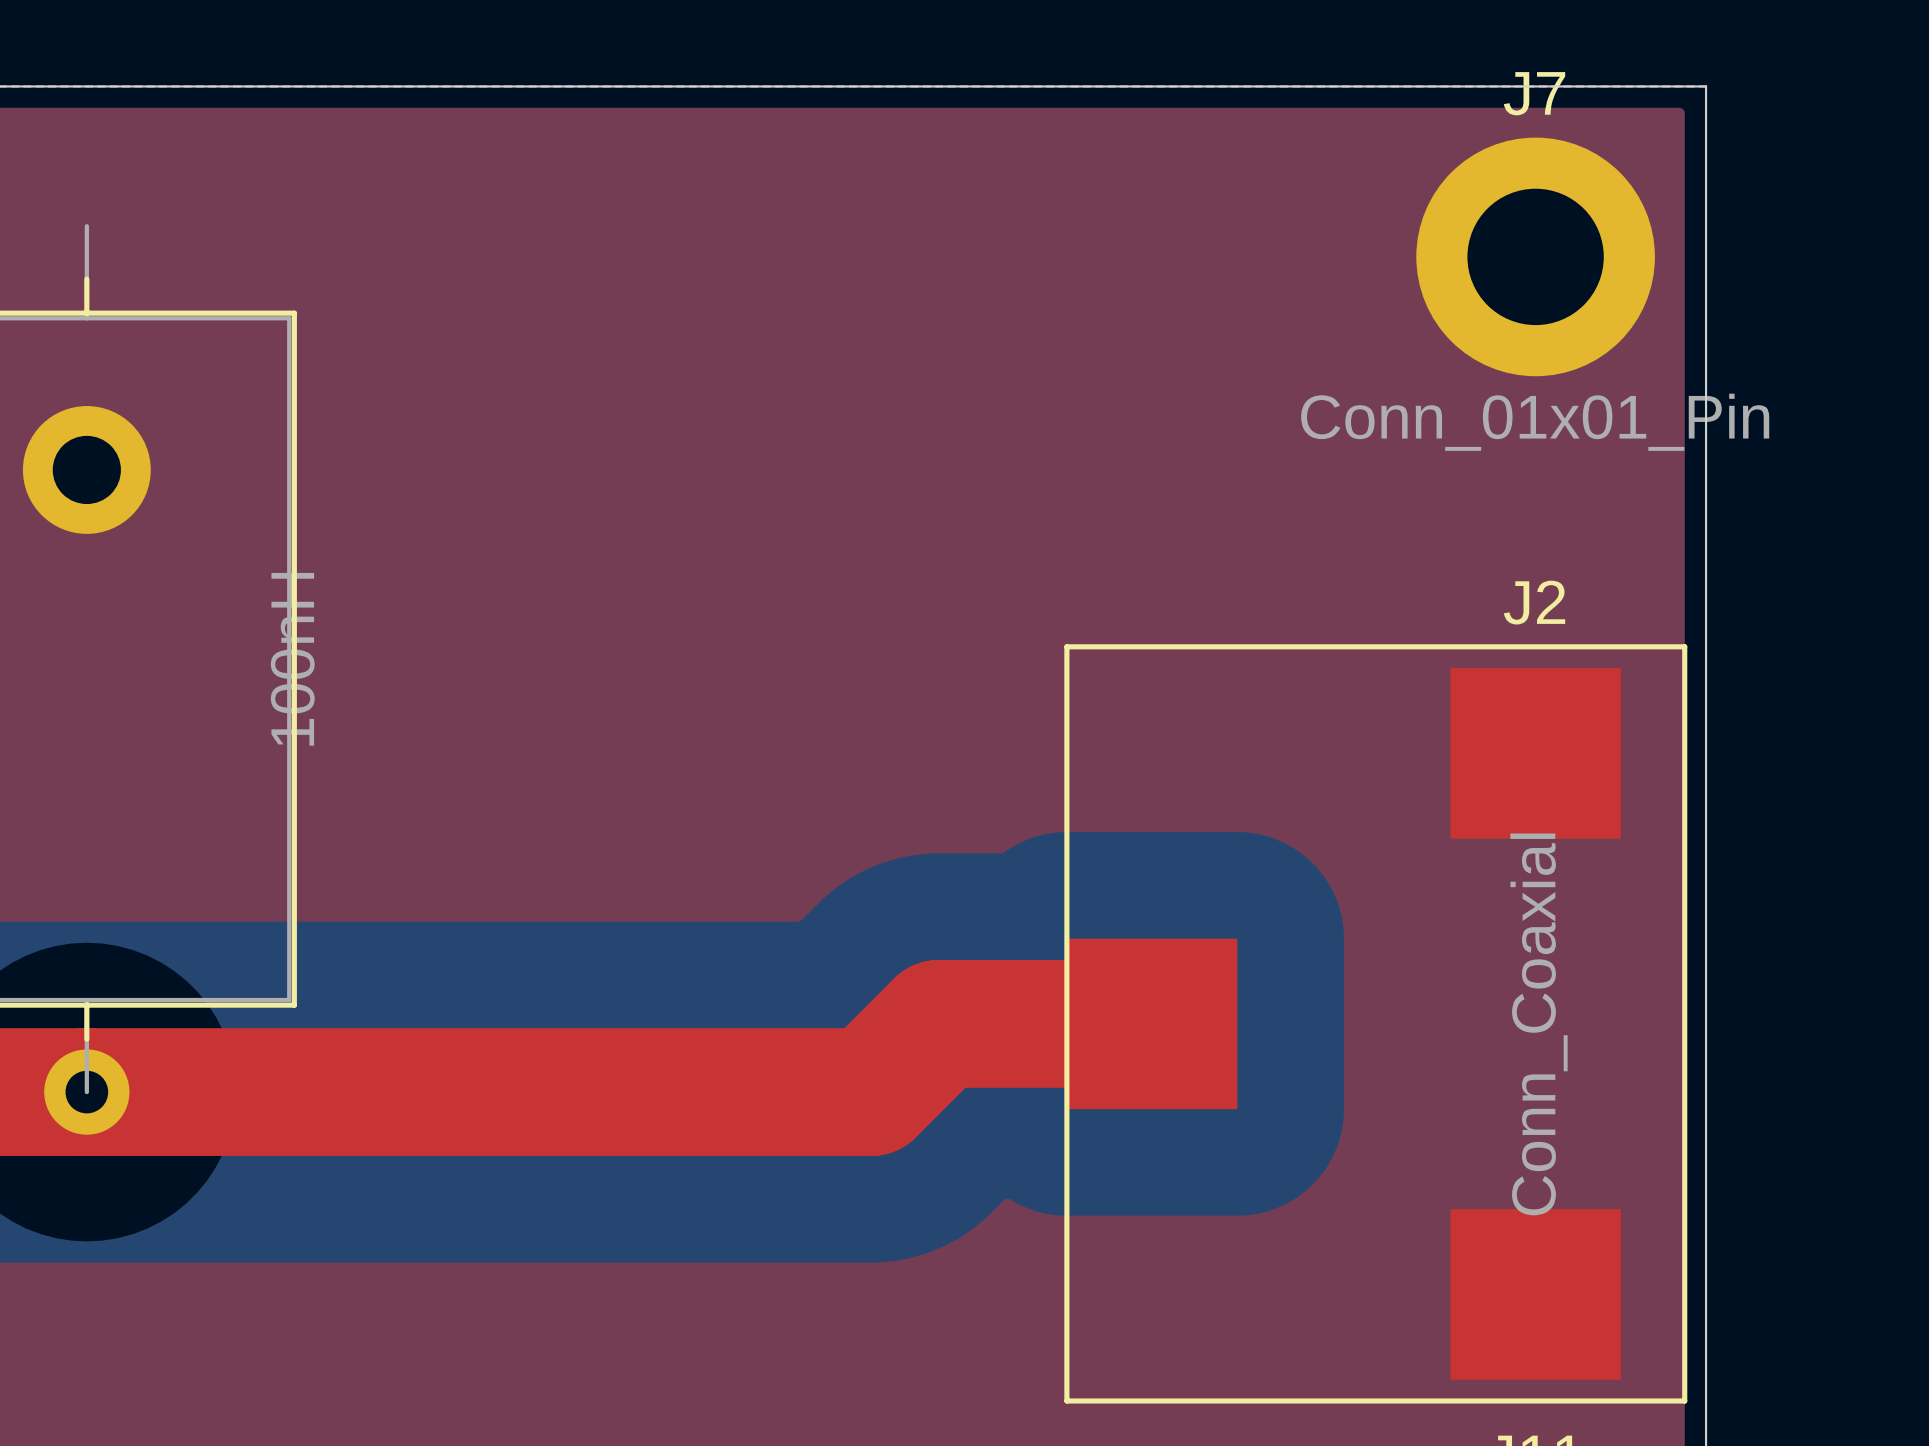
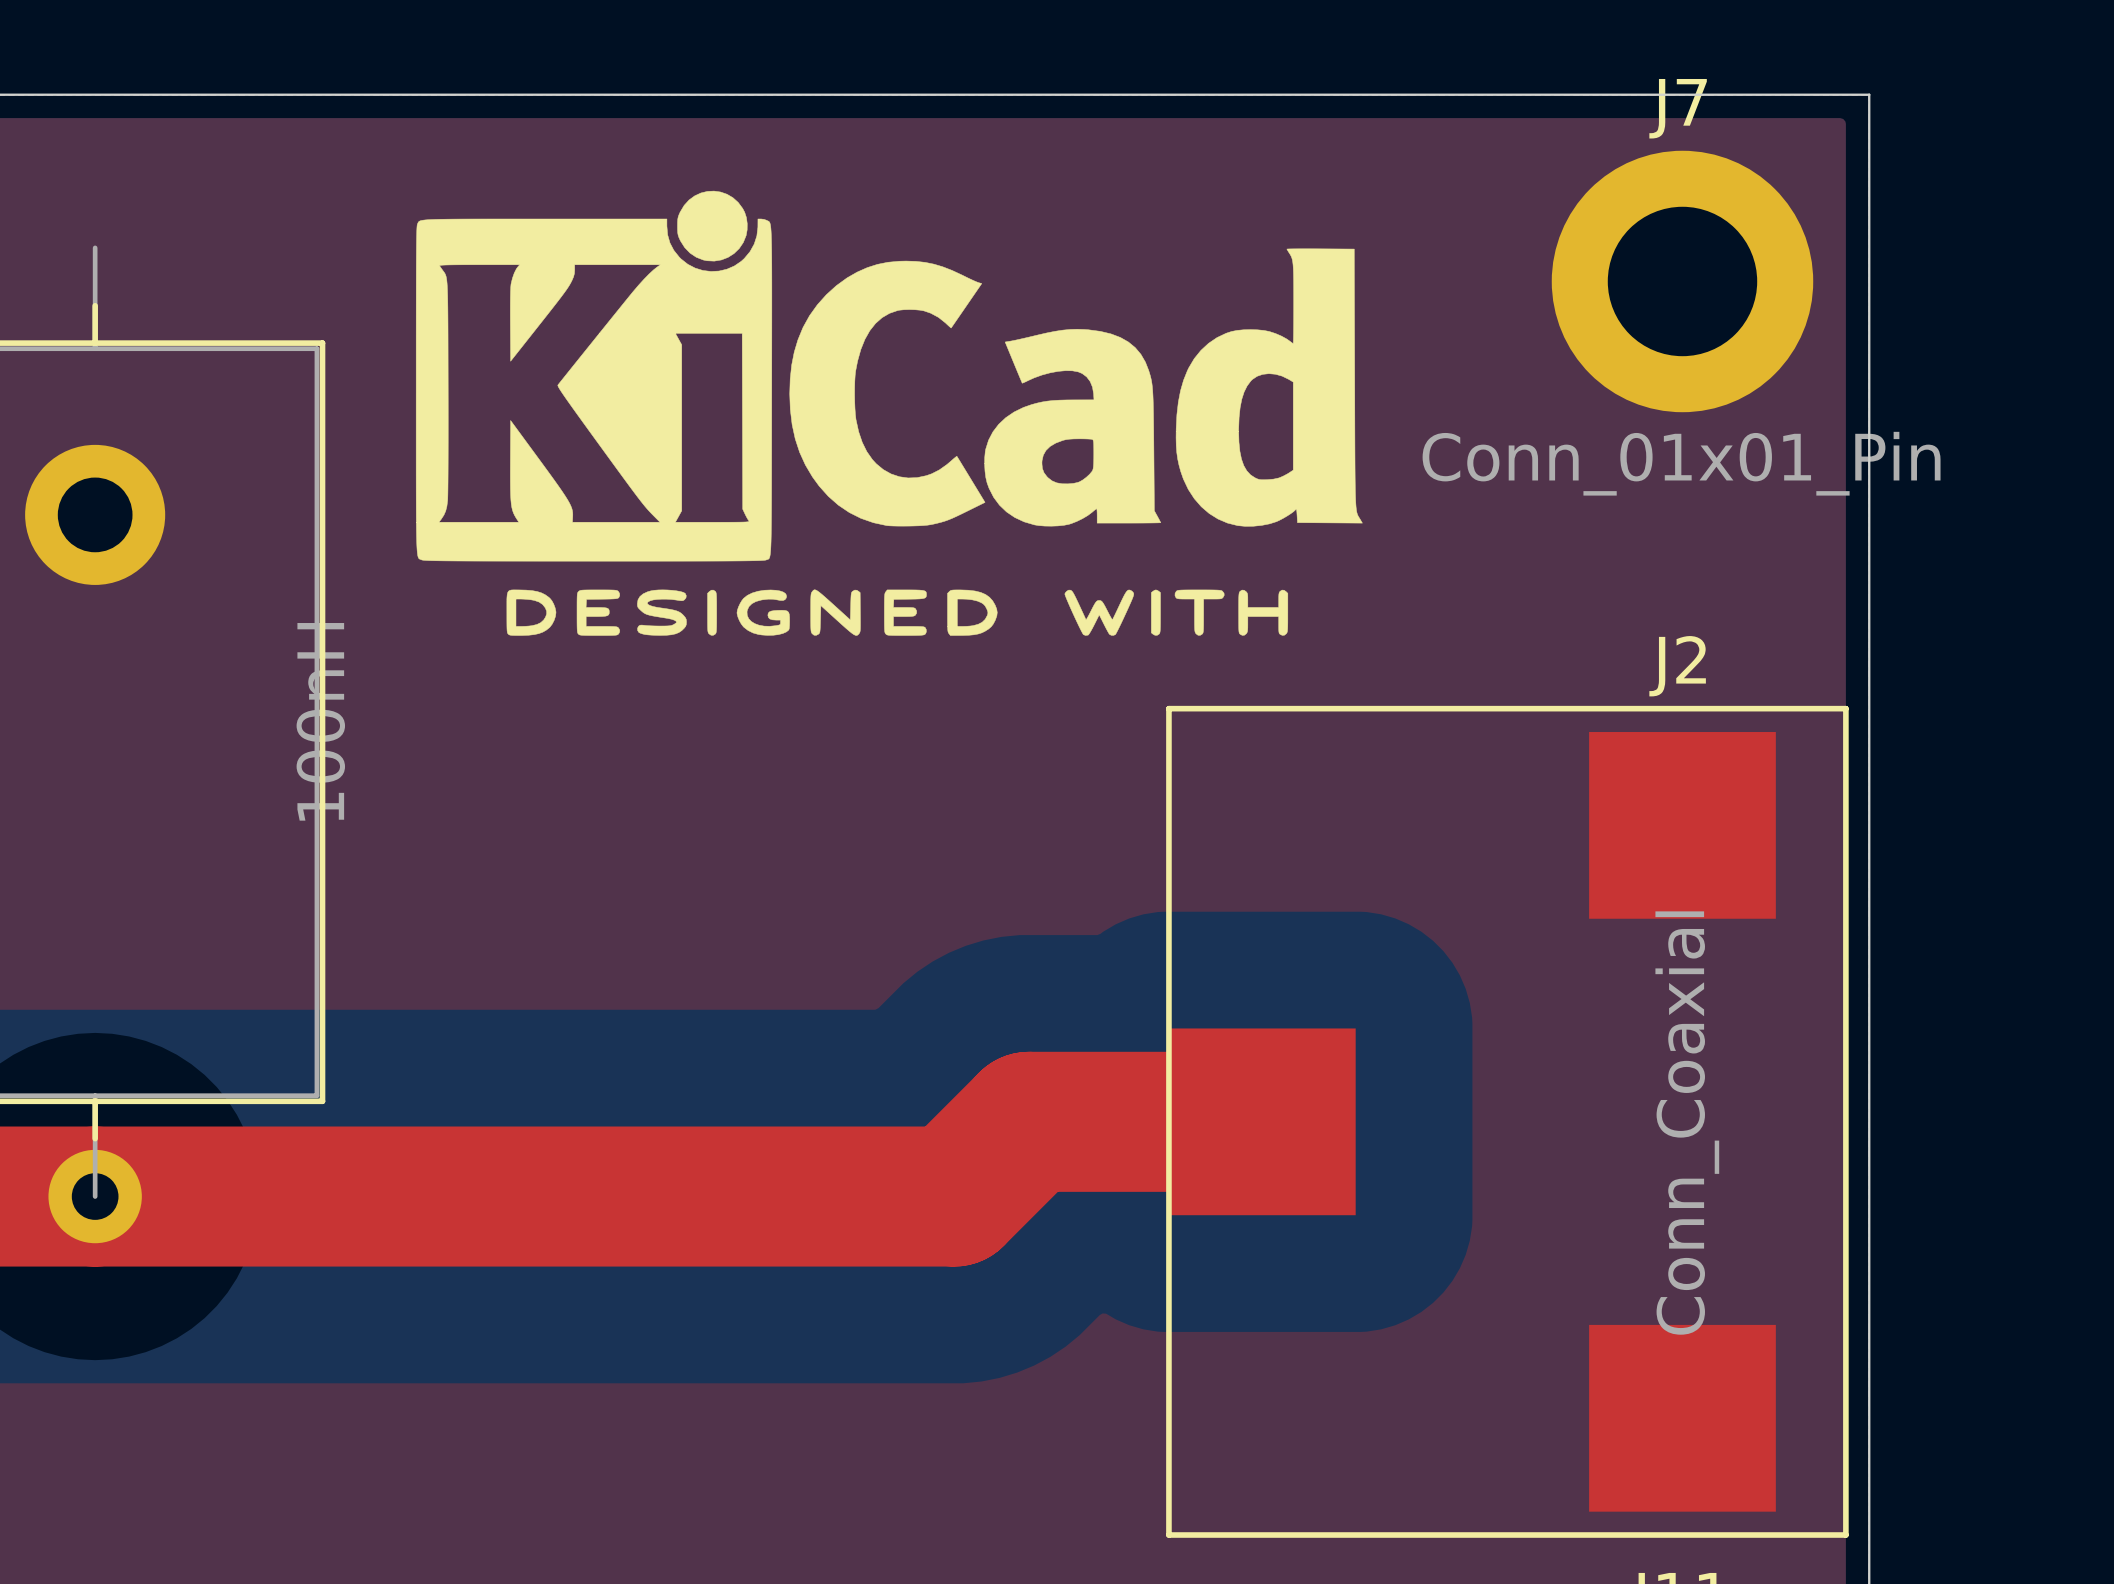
drawing: none -> [415, 190, 1363, 636]

